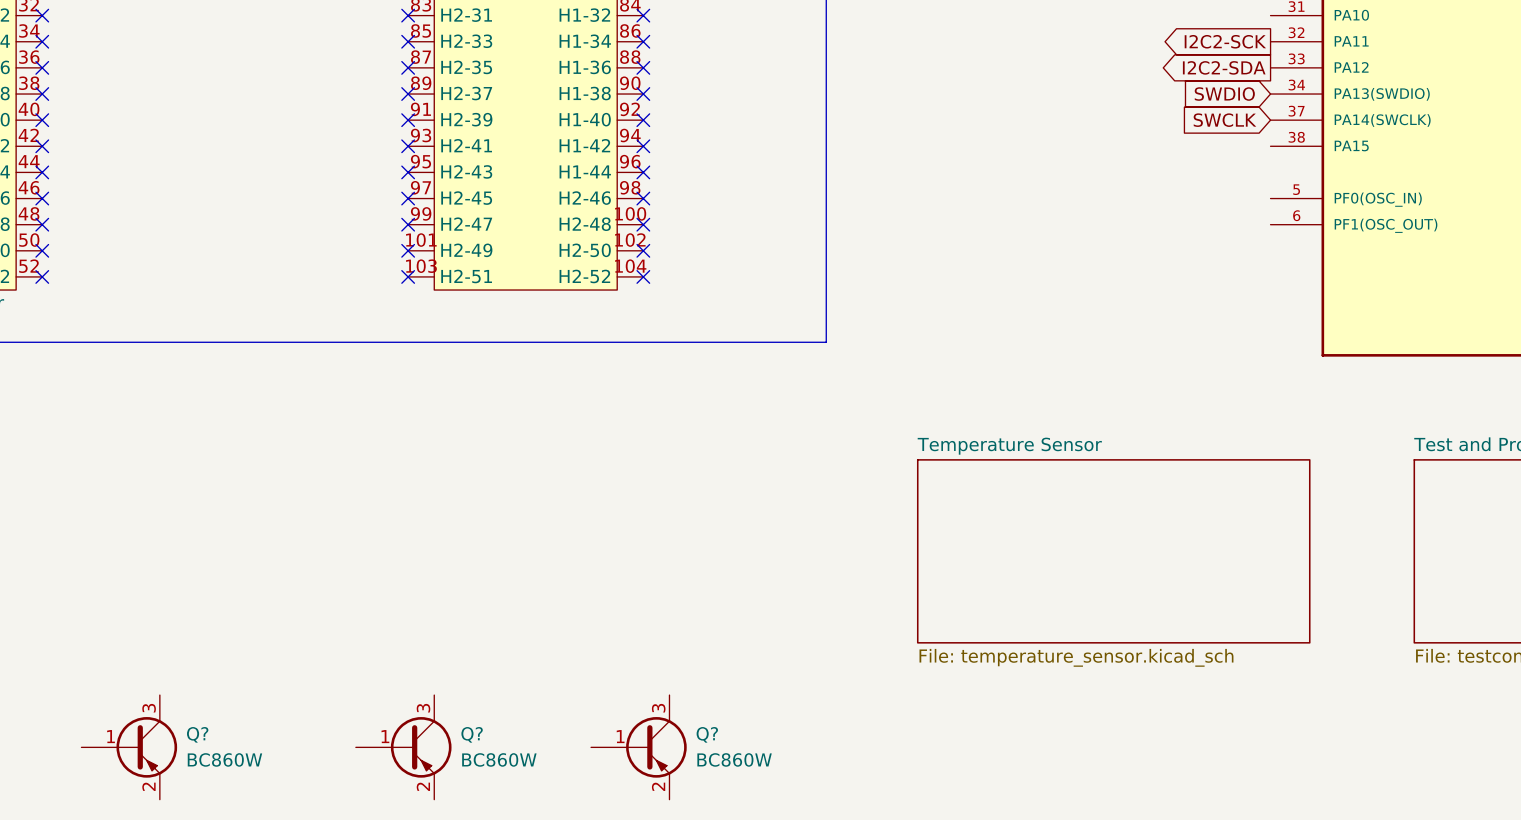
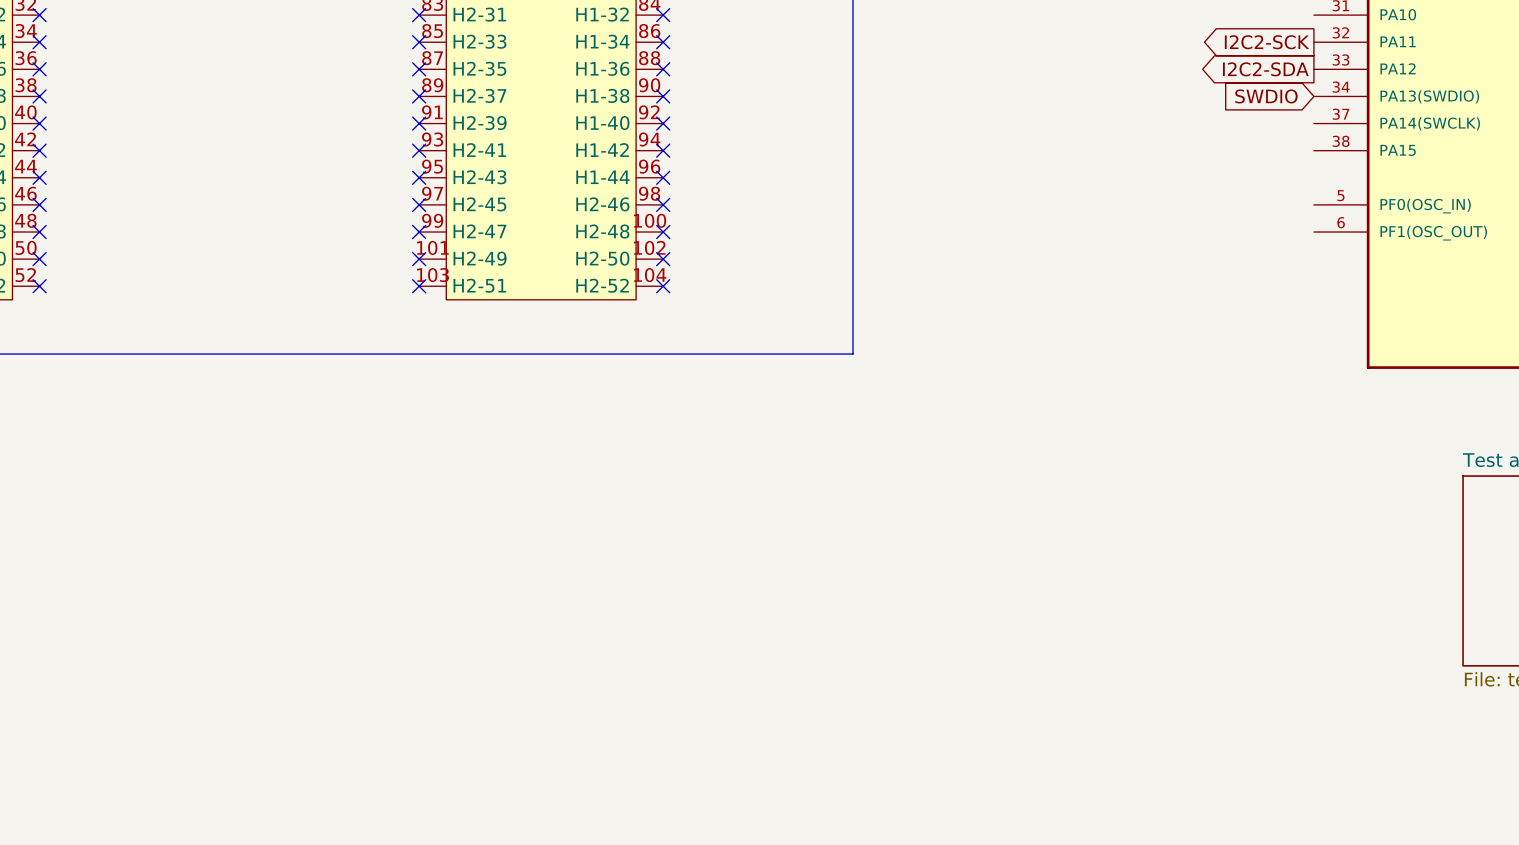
global label: SWCLK (1224, 120) -> none
sheet Temperature Sensor: File: temperature_sensor.kicad_sch (1113, 551) -> none
Q?: BC860W (129, 747) -> none
Q?: BC860W (403, 747) -> none
Q?: BC860W (638, 747) -> none

